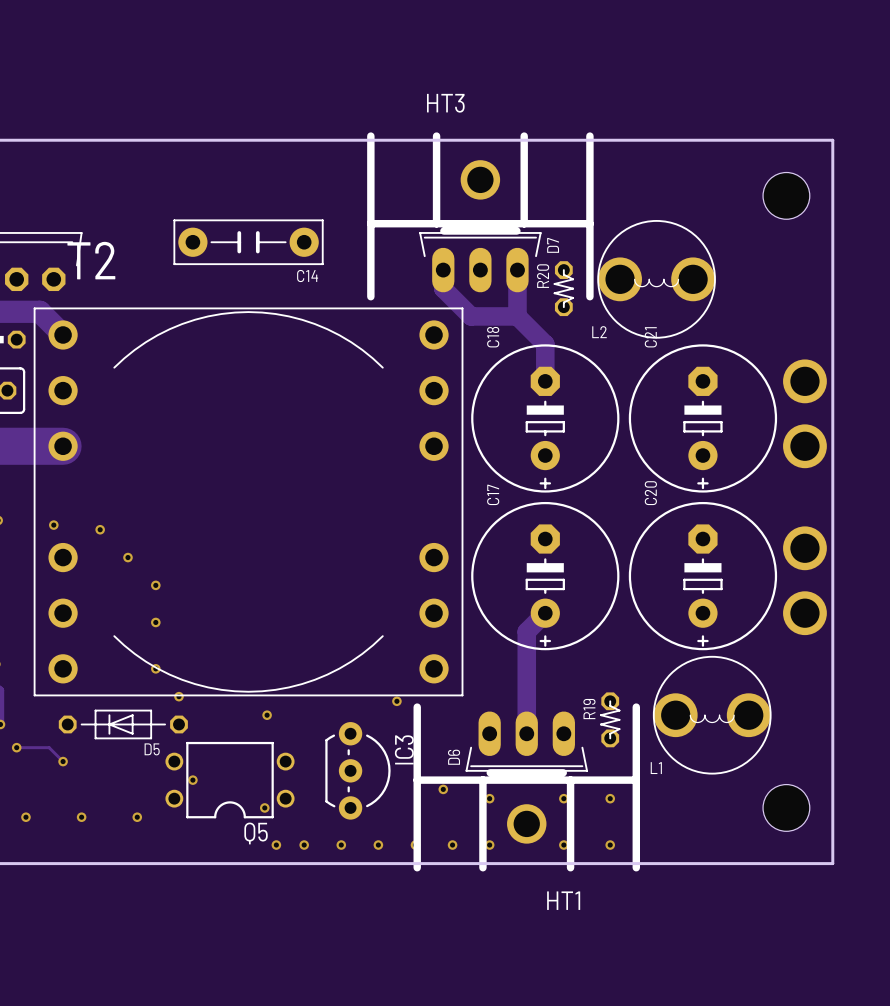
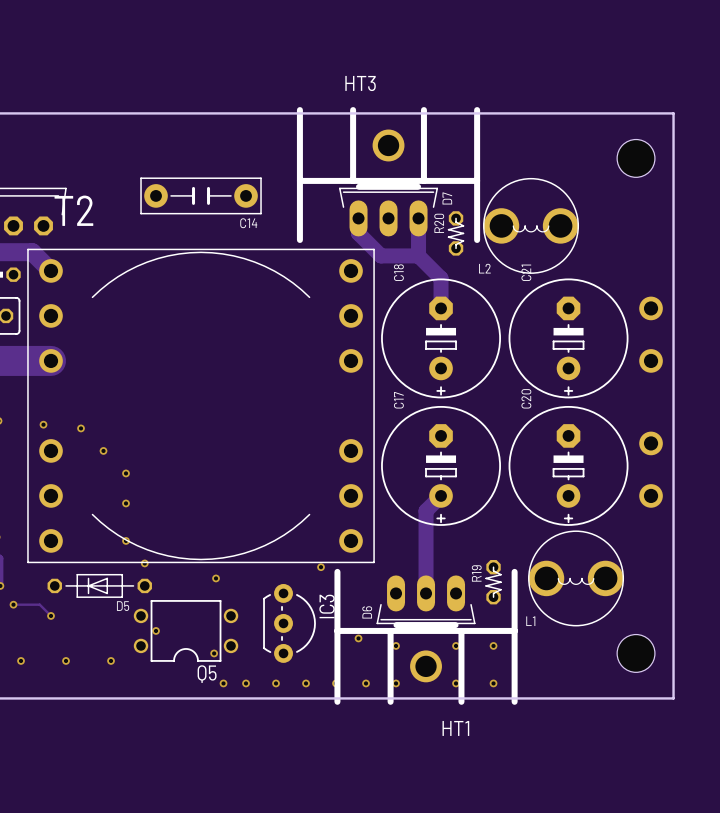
part footprint: [783, 359, 827, 404] -> [639, 296, 663, 321]
part footprint: [783, 424, 827, 469] -> [639, 349, 663, 373]
part footprint: [783, 526, 827, 571] -> [639, 431, 663, 456]
part footprint: [783, 591, 827, 636] -> [639, 484, 663, 508]

